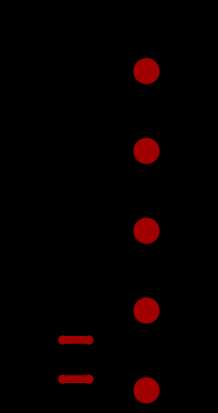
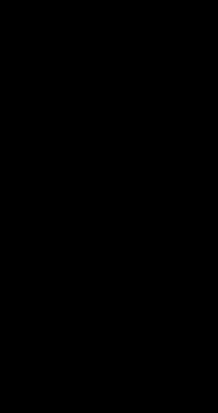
part: (146, 71) -> none
part: (146, 150) -> none
part: (146, 230) -> none
part: (146, 310) -> none
part: (75, 339) -> none
part: (75, 379) -> none
part: (146, 390) -> none

